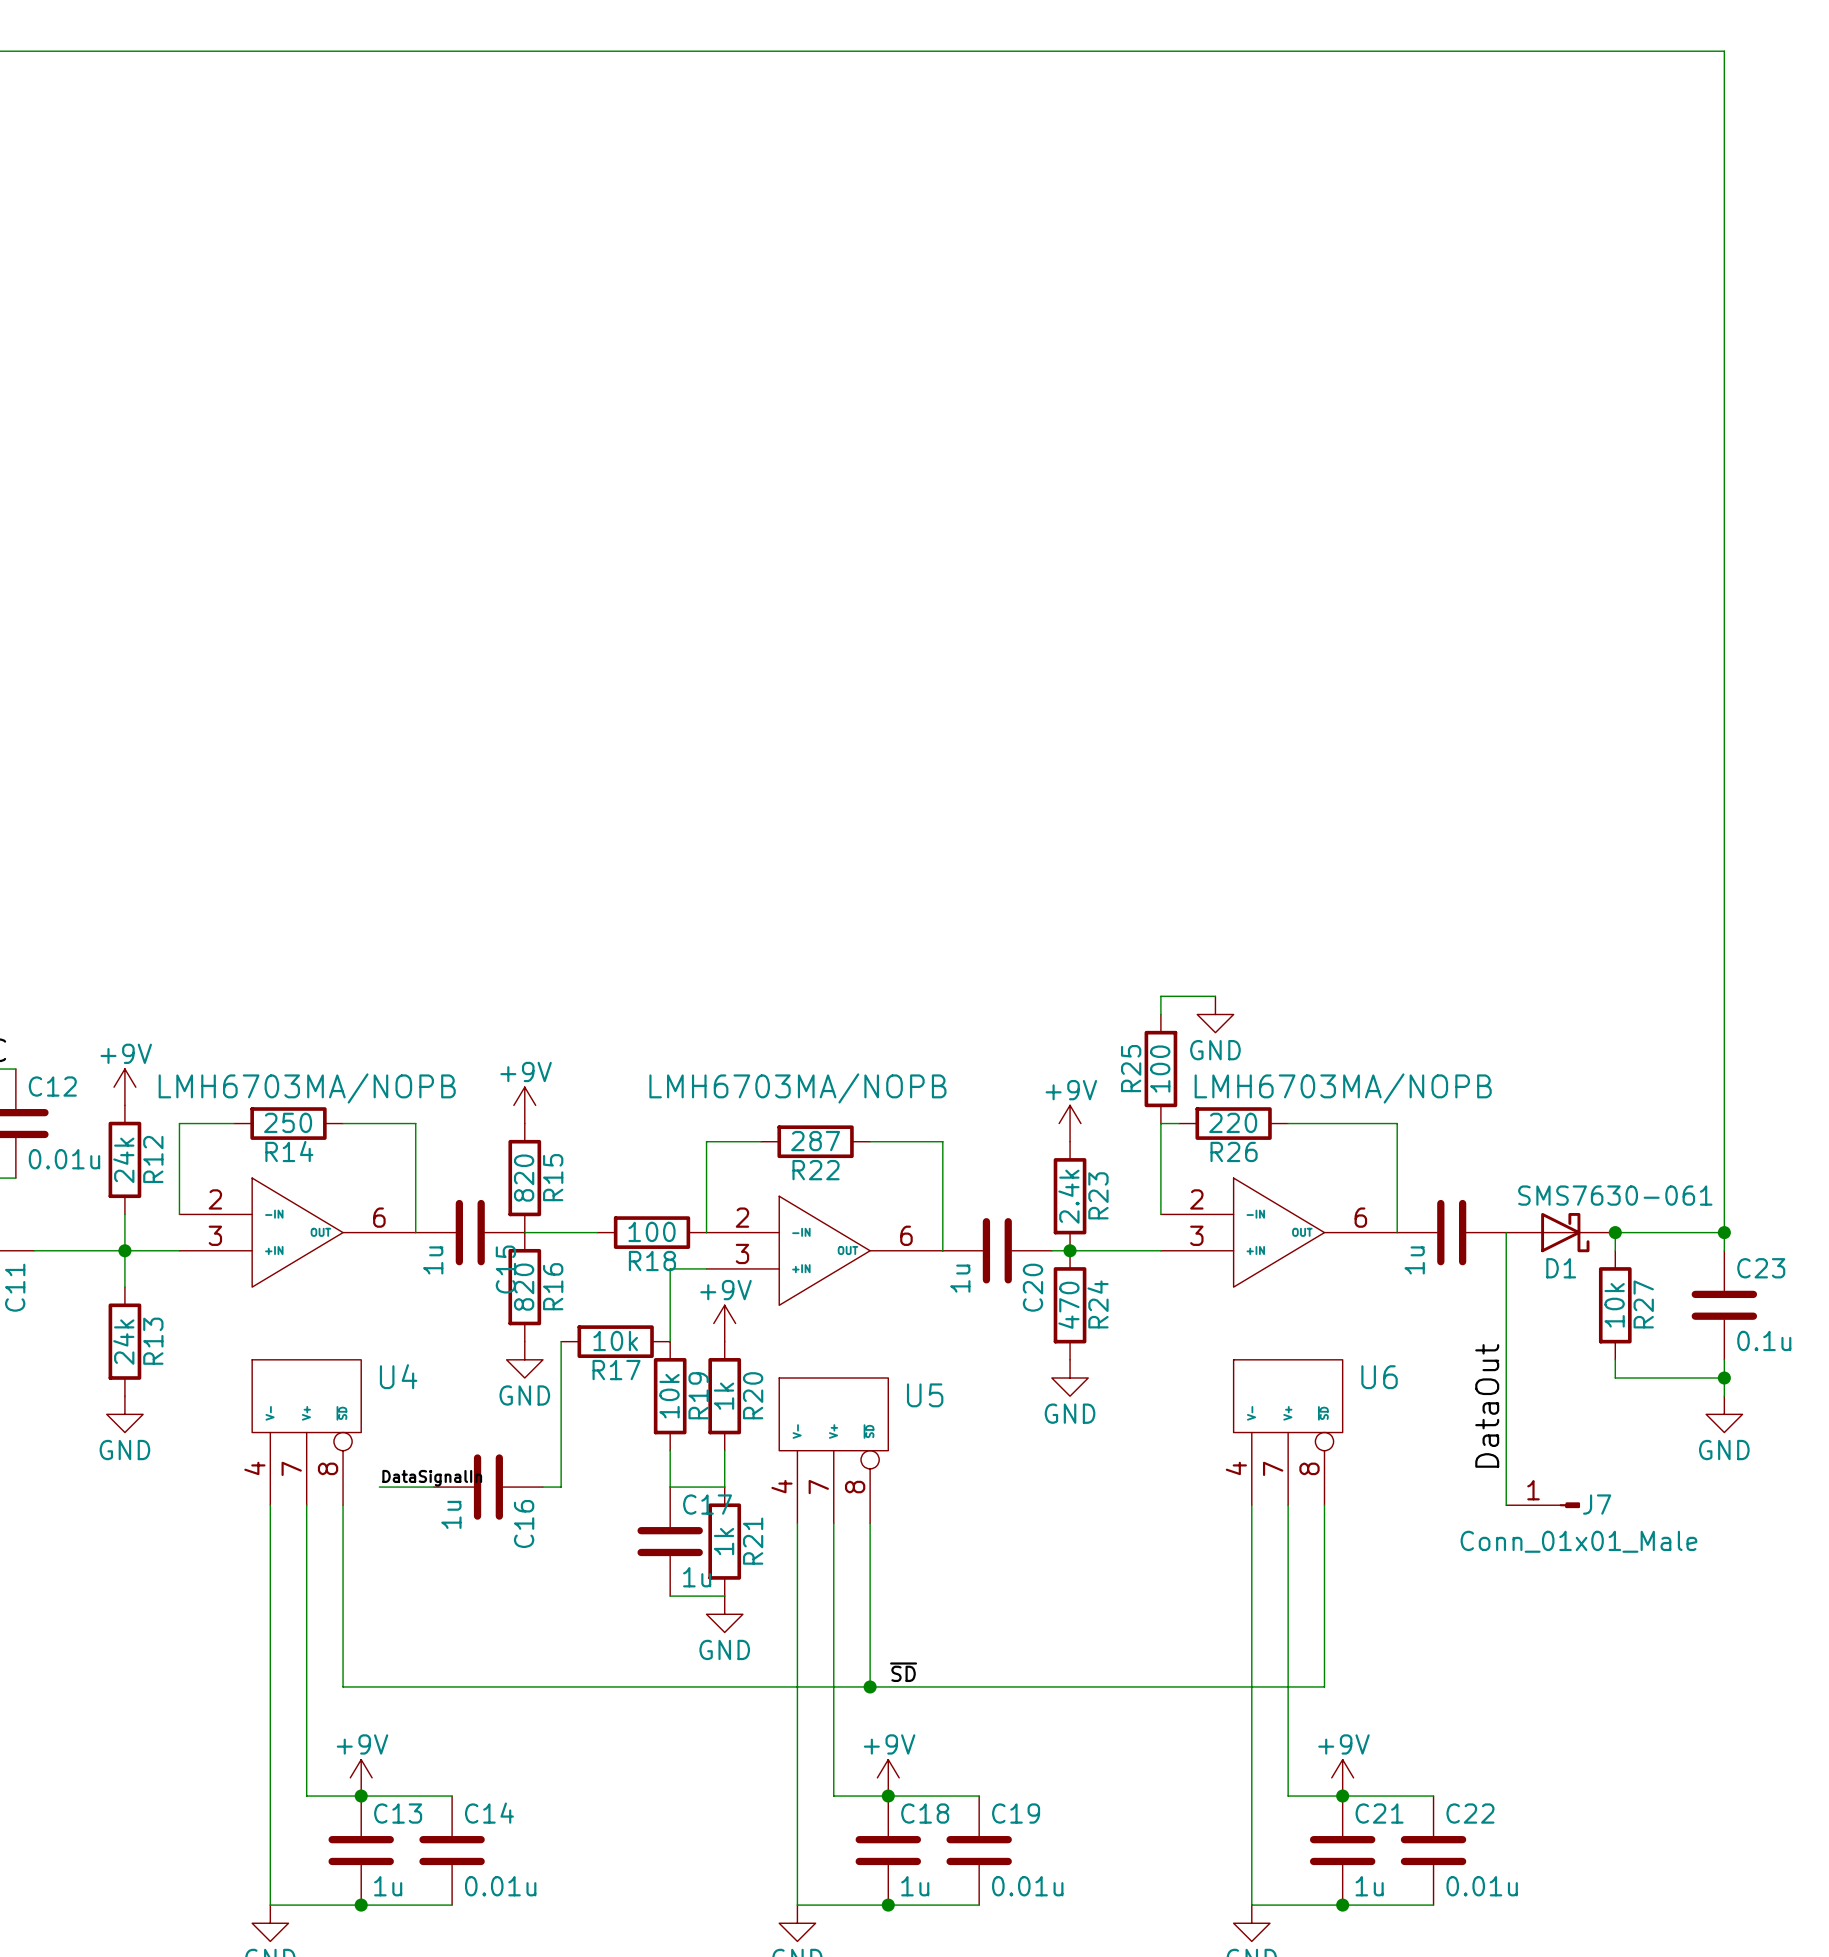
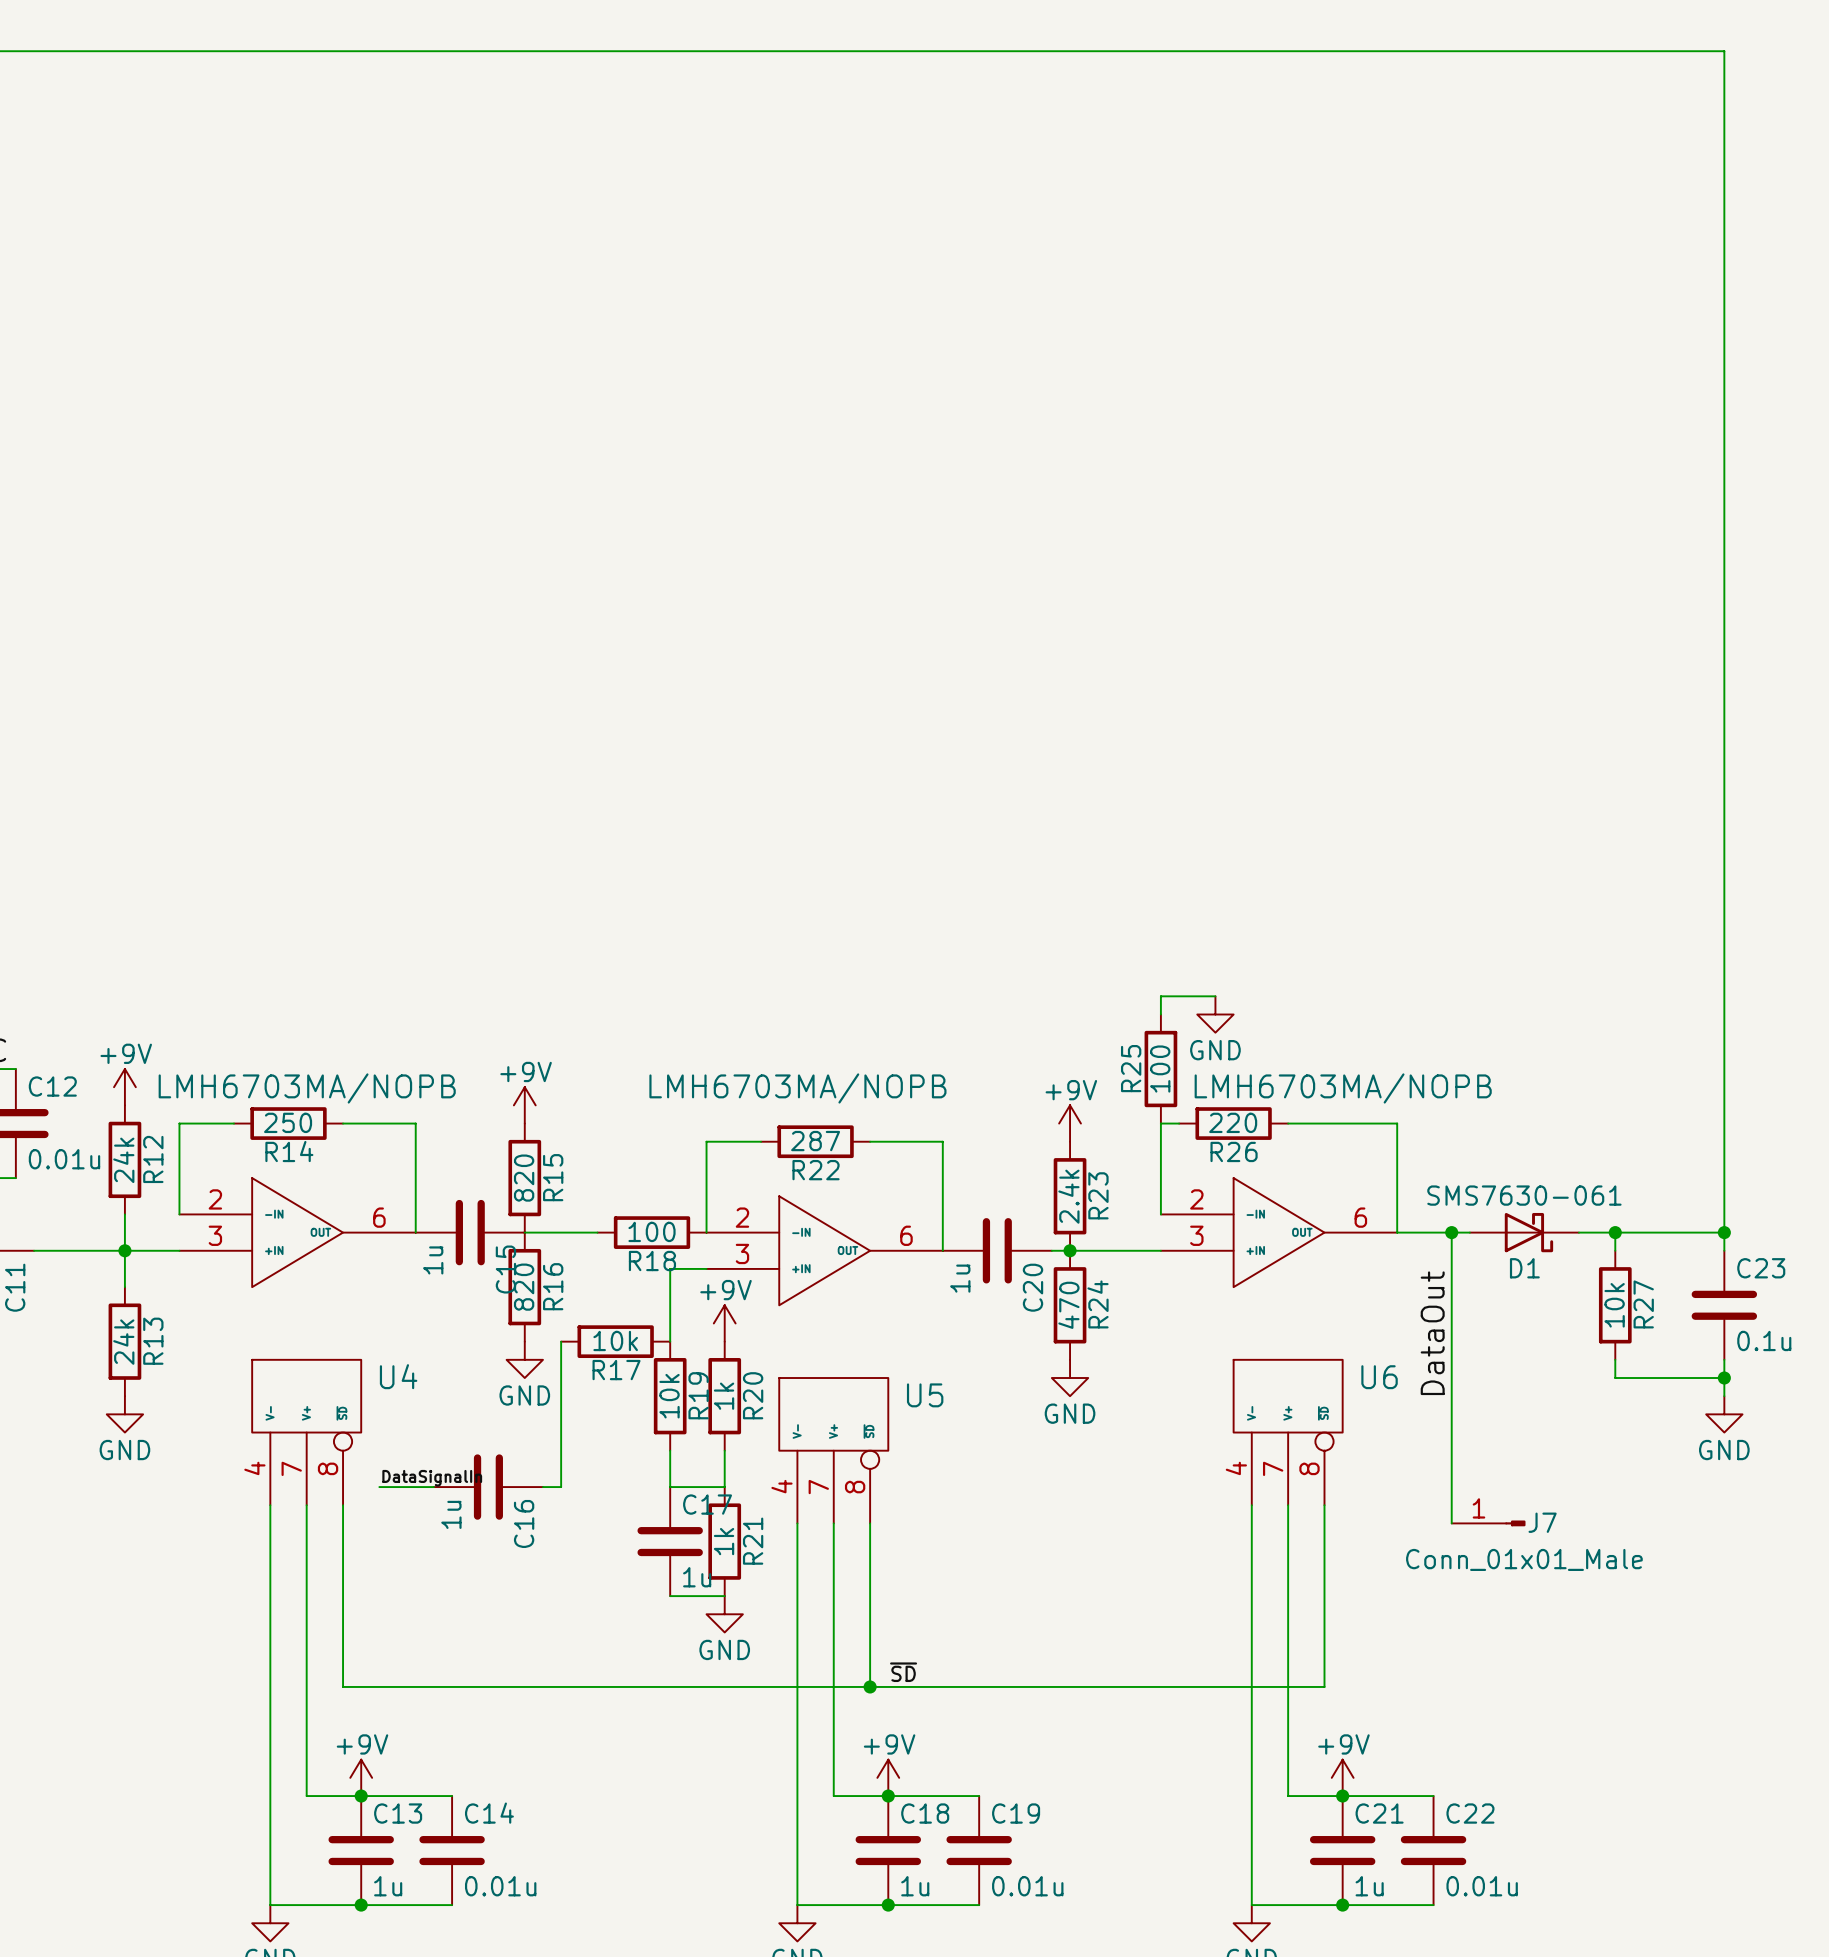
D1 value position: SMS7630-061 (1615, 1195) -> SMS7630-061 (1524, 1195)
wire: none -> (1451, 1232) (1451, 1523)
part: 1u (1451, 1232) -> none
junction: none -> (1451, 1232)
wire: (1506, 1232) (1506, 1505) -> none
D1 position: (1560, 1232) -> (1524, 1232)
label position: DataOut (1487, 1405) -> DataOut (1432, 1333)
J7 position: (1543, 1505) -> (1488, 1523)

